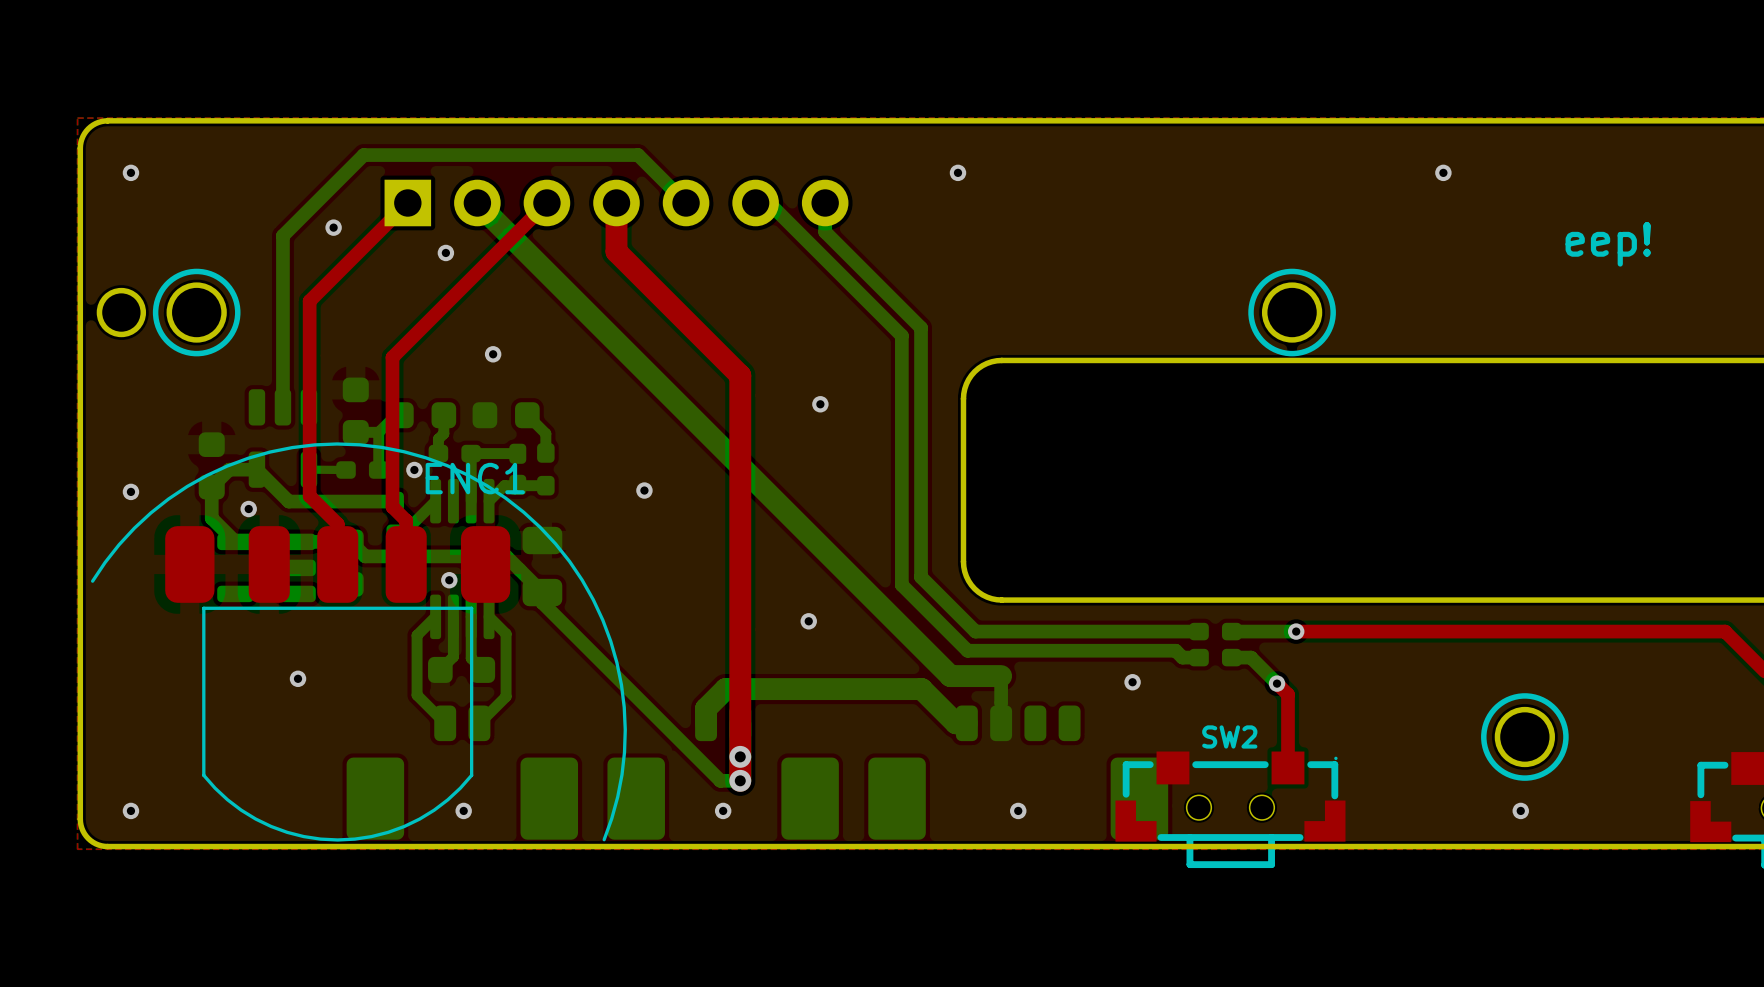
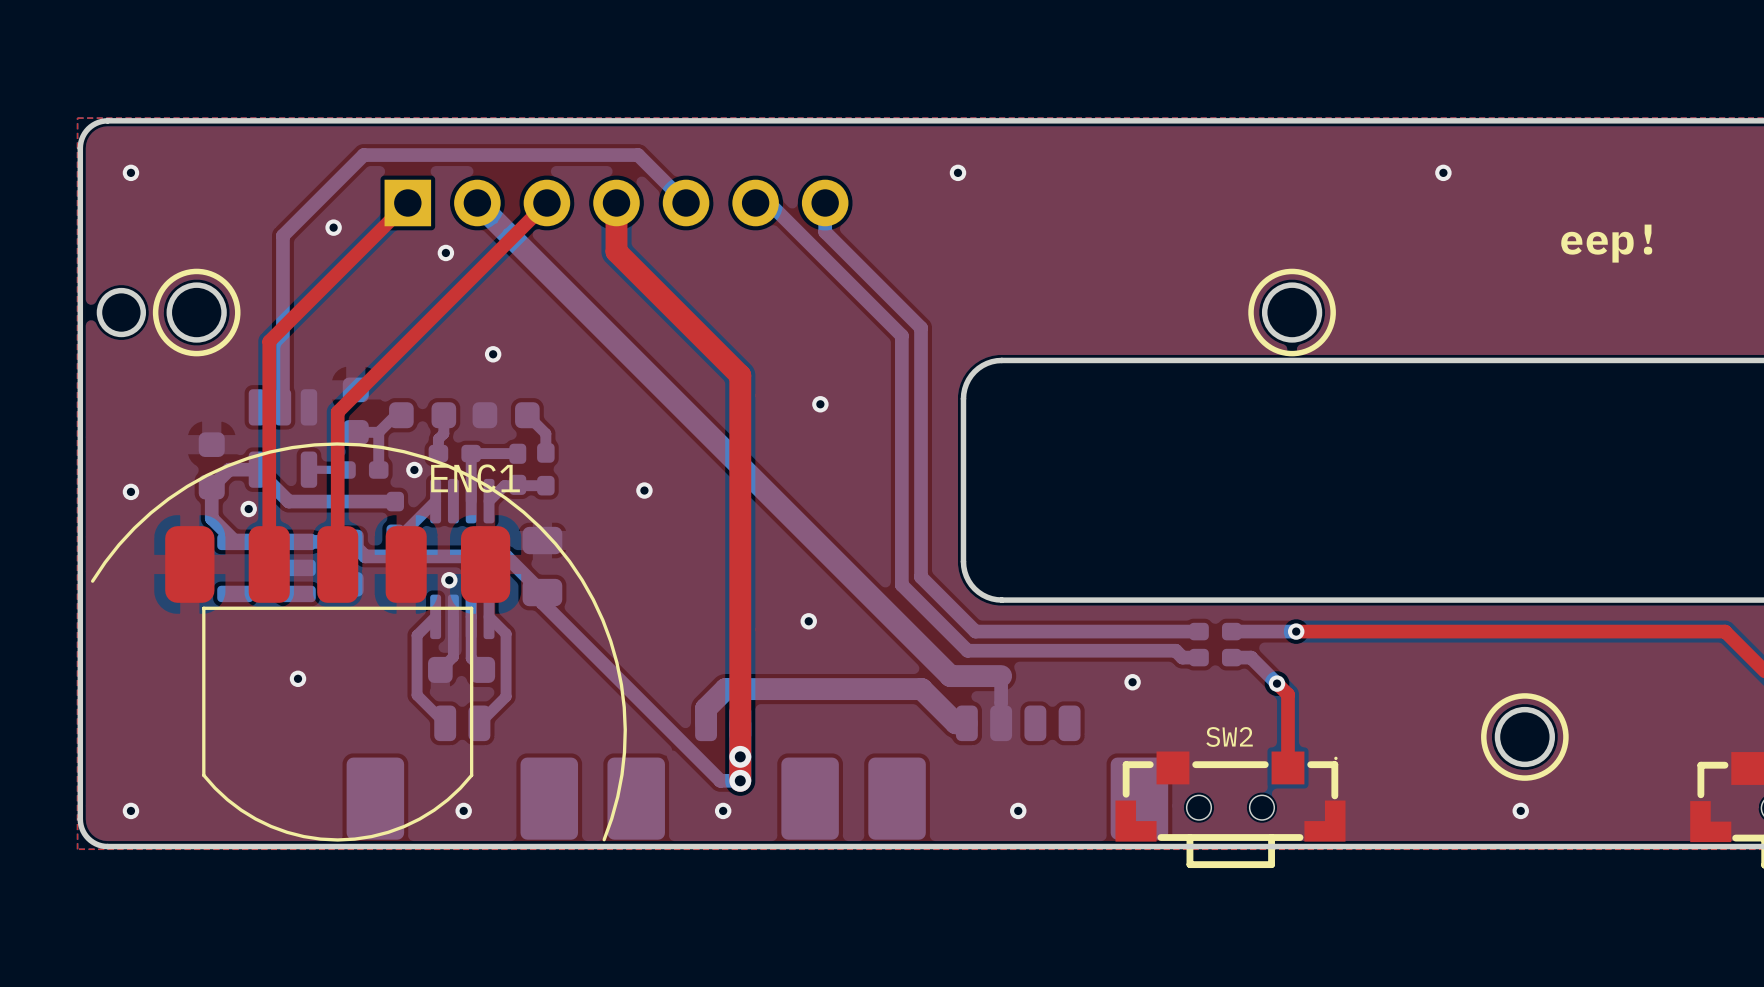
top track: (309, 301) (309, 496) (337, 524) -> (309, 301) (269, 341) (269, 564)
top track: (392, 357) (392, 506) (406, 520) (406, 564) -> (392, 357) (337, 412) (337, 524)

